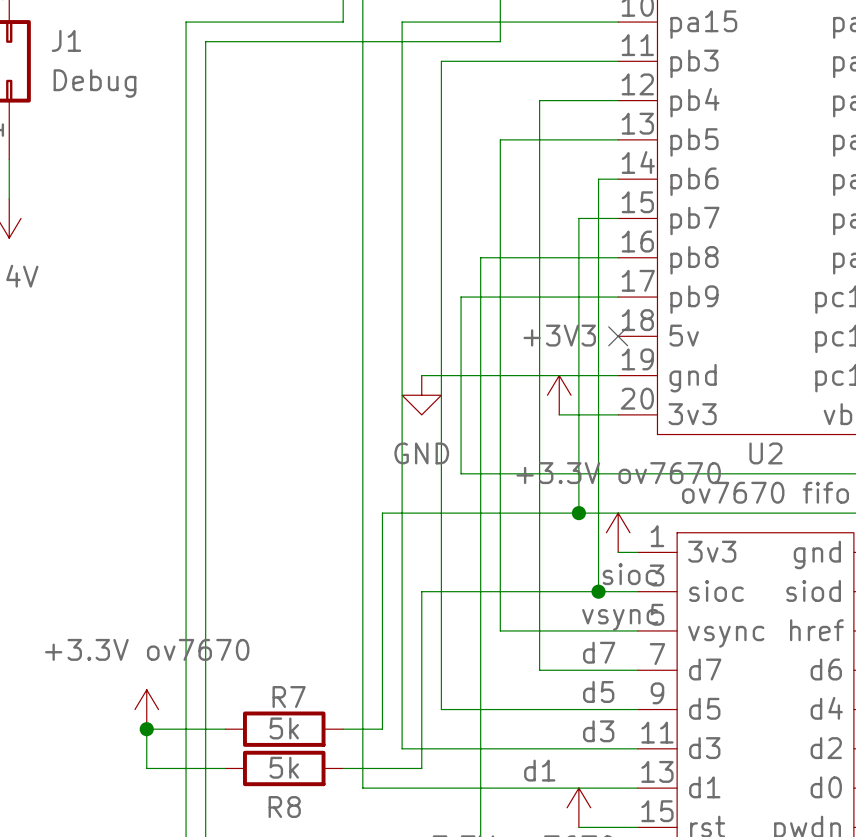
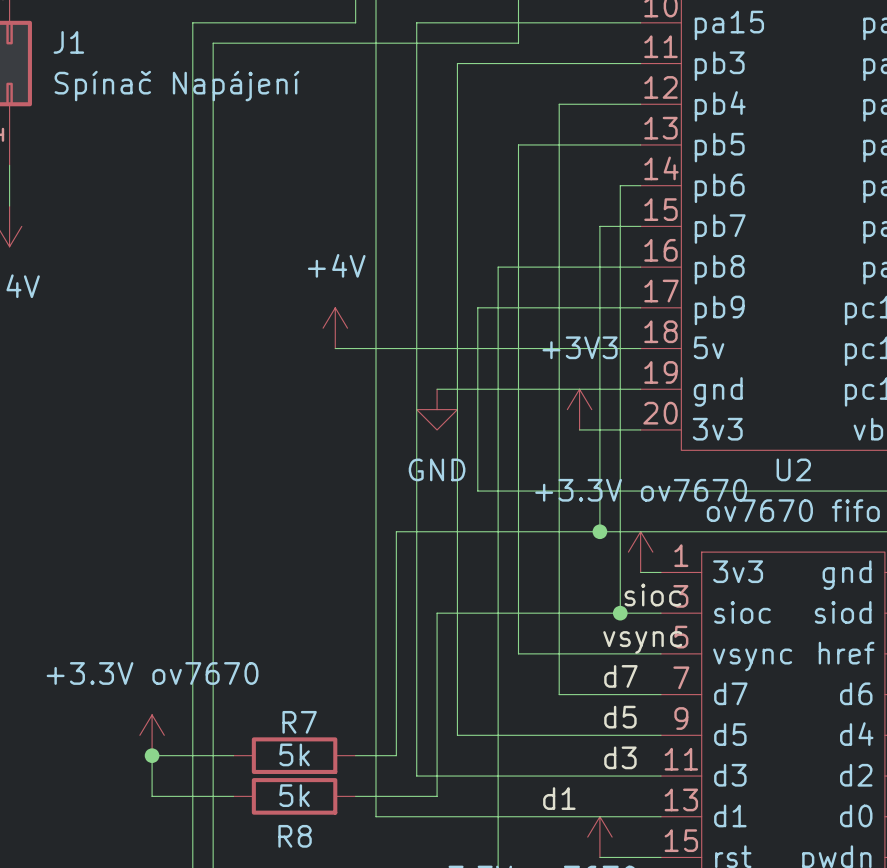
J1 value: Debug (94, 83) -> Spínač Napájení (176, 86)
power symbol: none -> +4V (335, 328)
wire: none -> (335, 348) (640, 348)
no-connect mark: (618, 336) -> none

